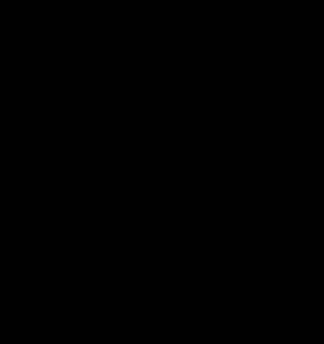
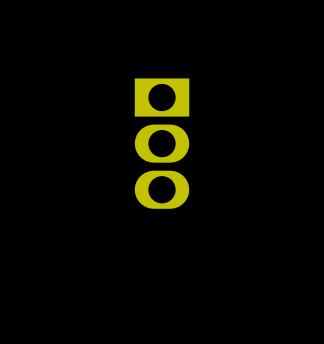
part: none -> (162, 143)

